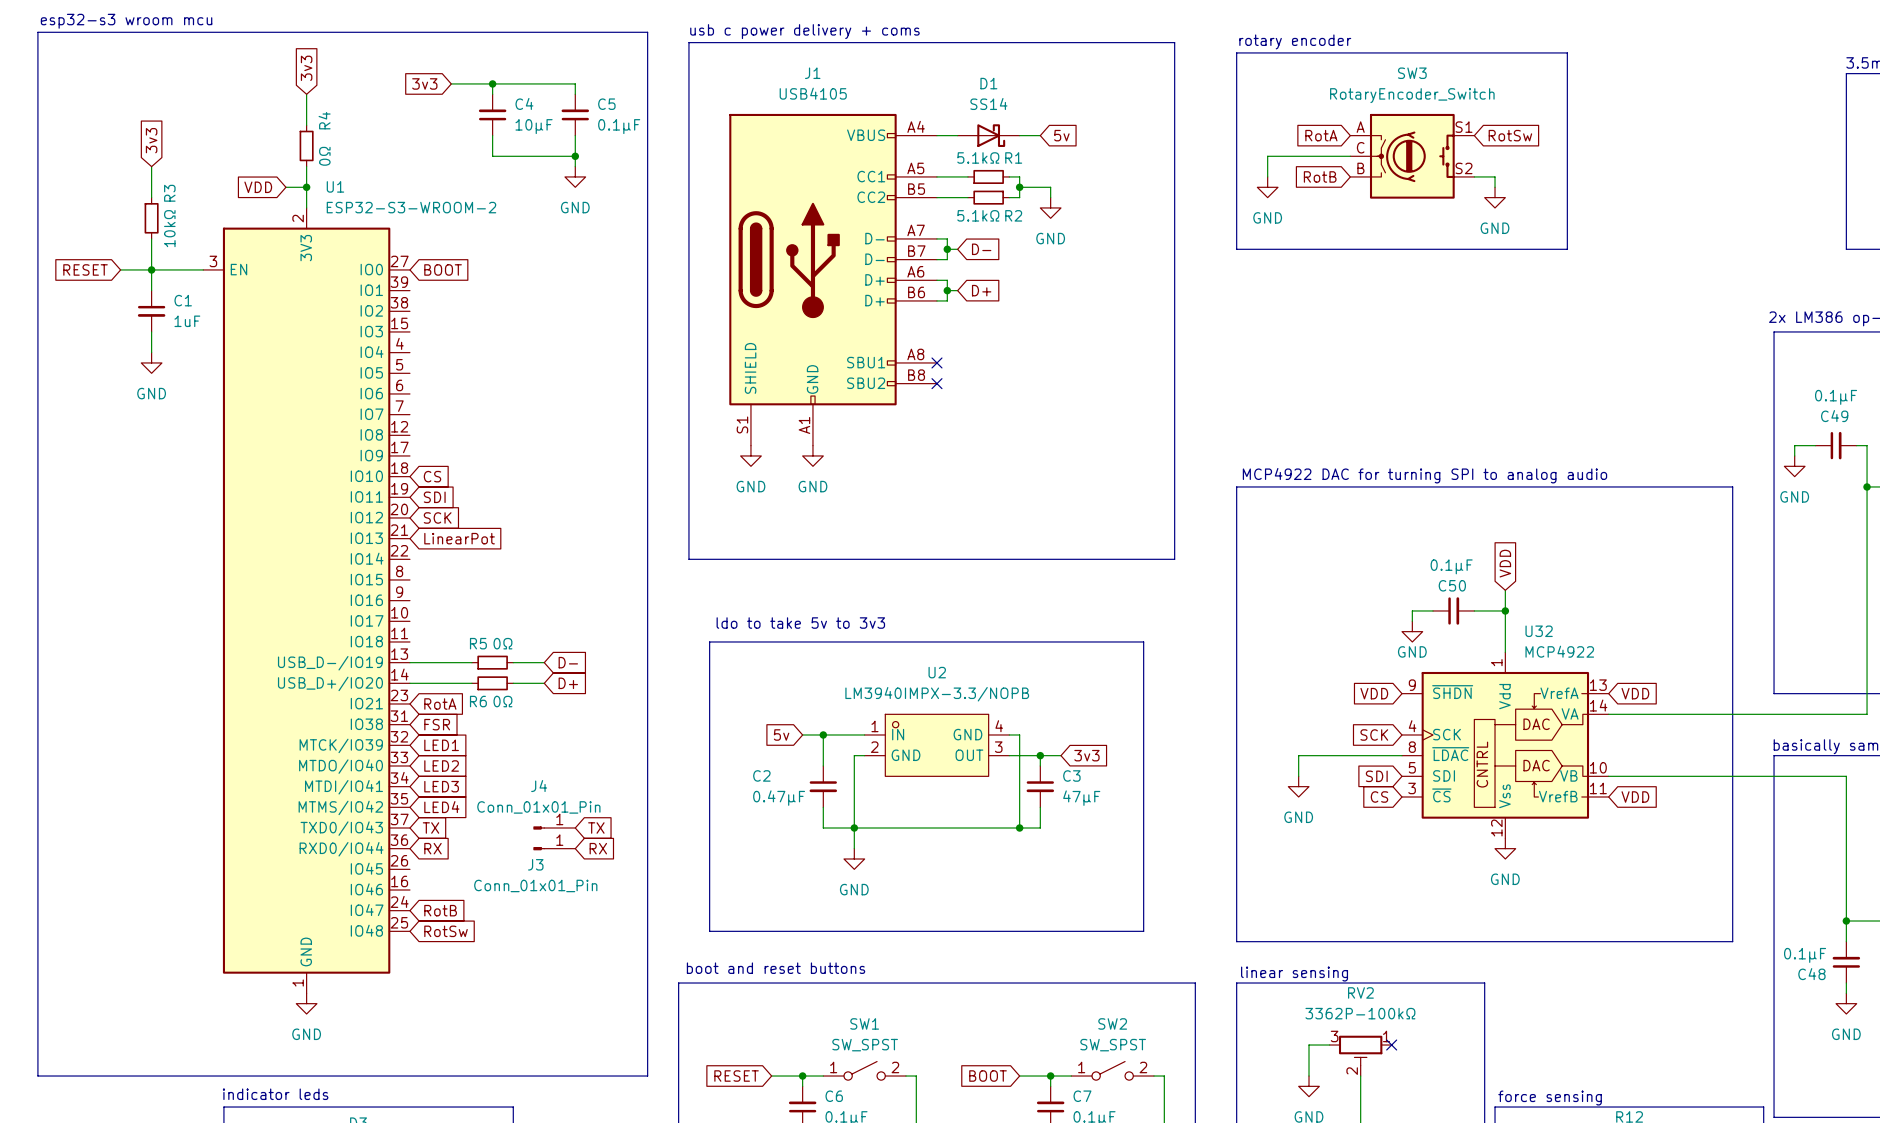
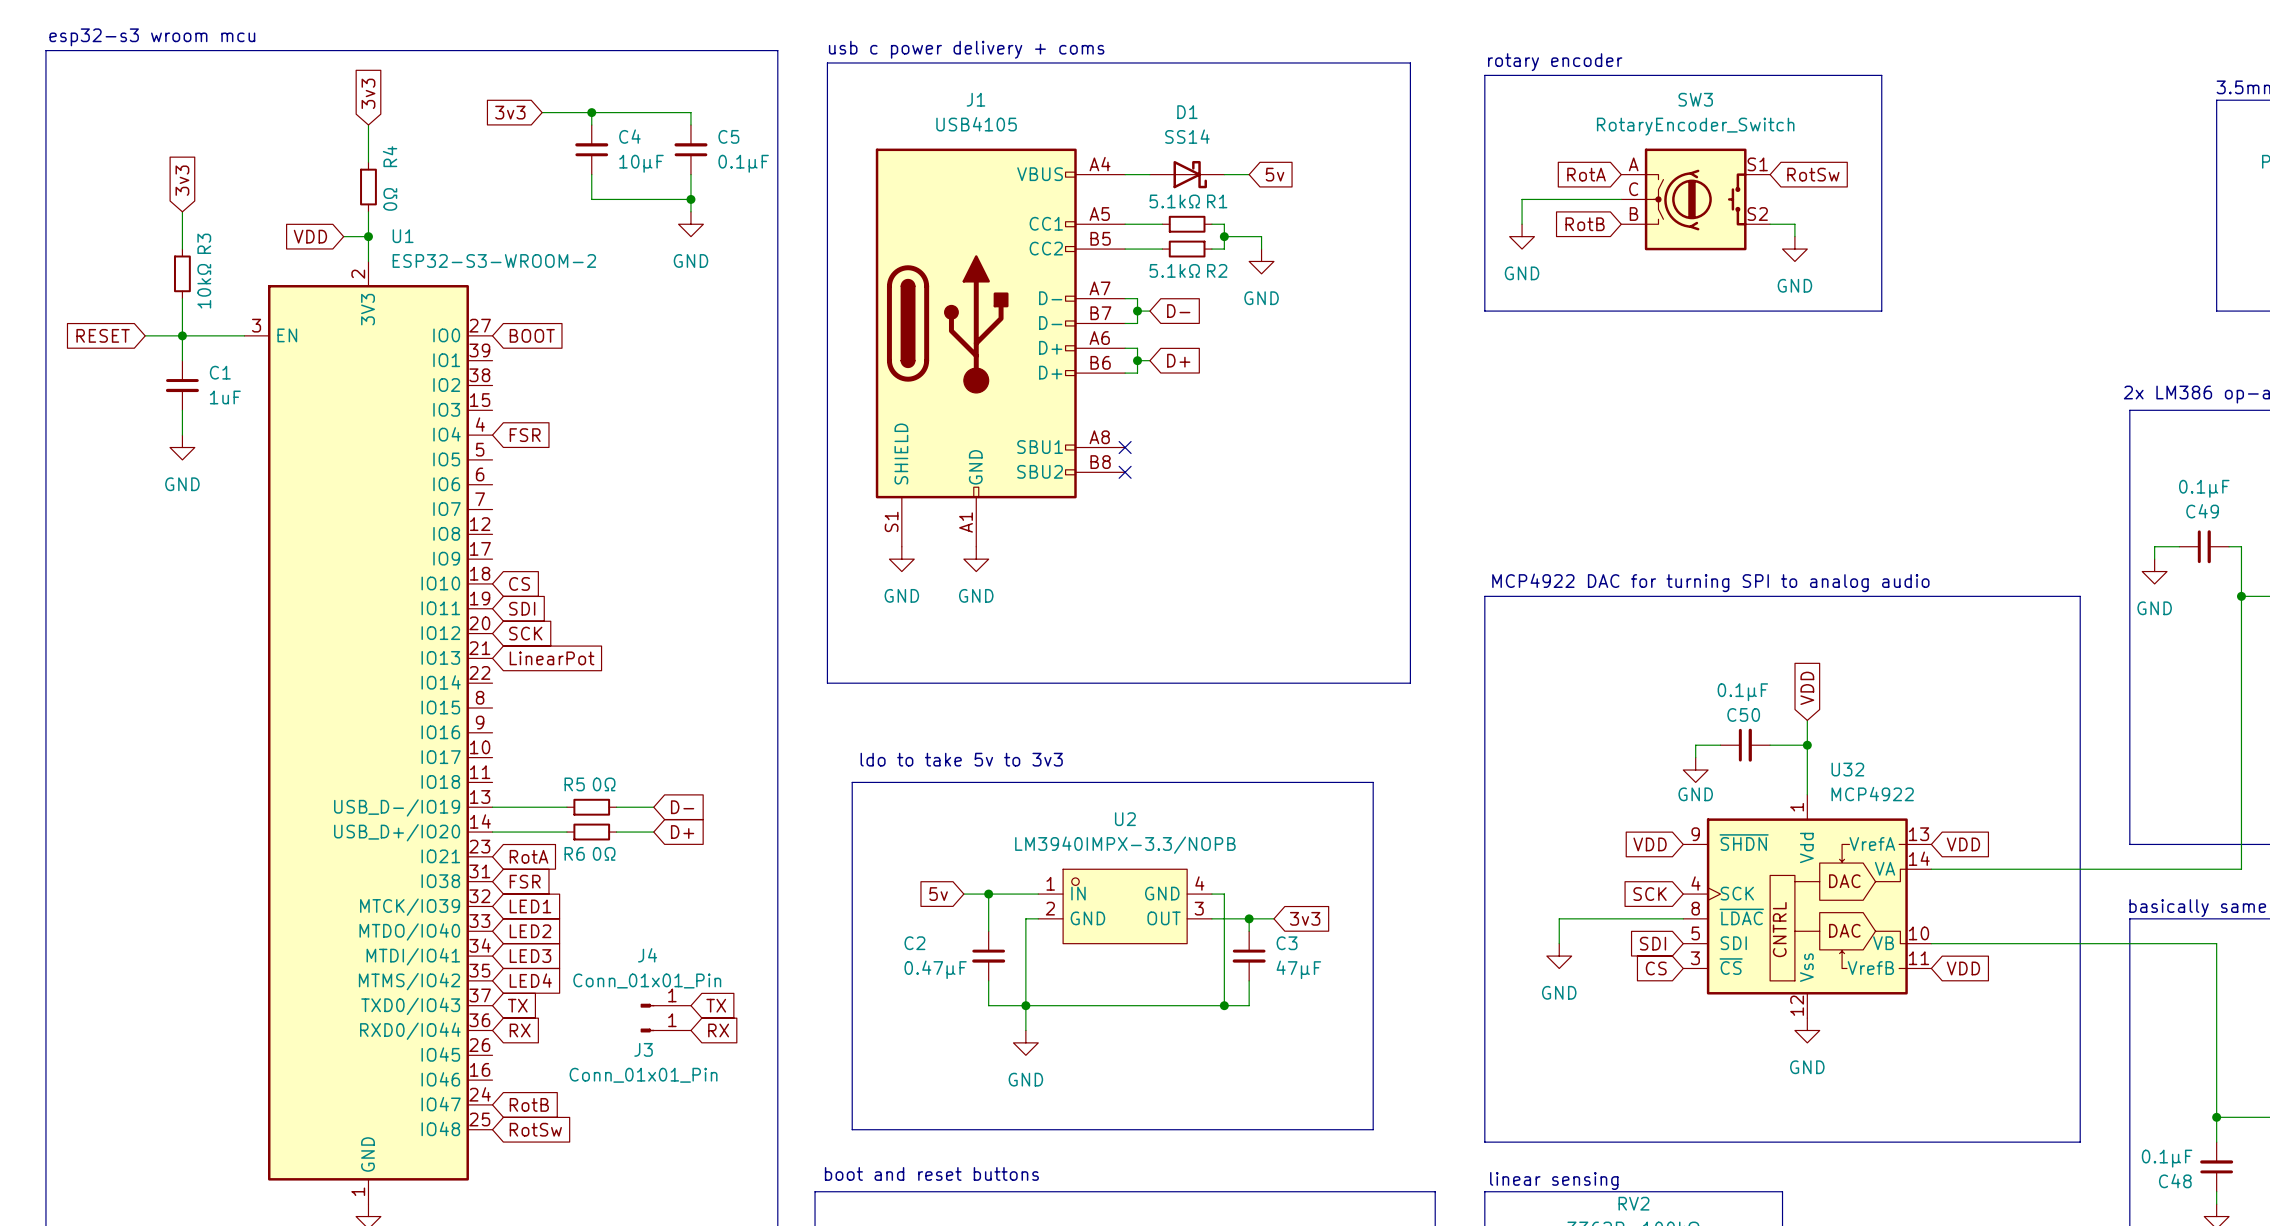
global label: none -> FSR (525, 435)

